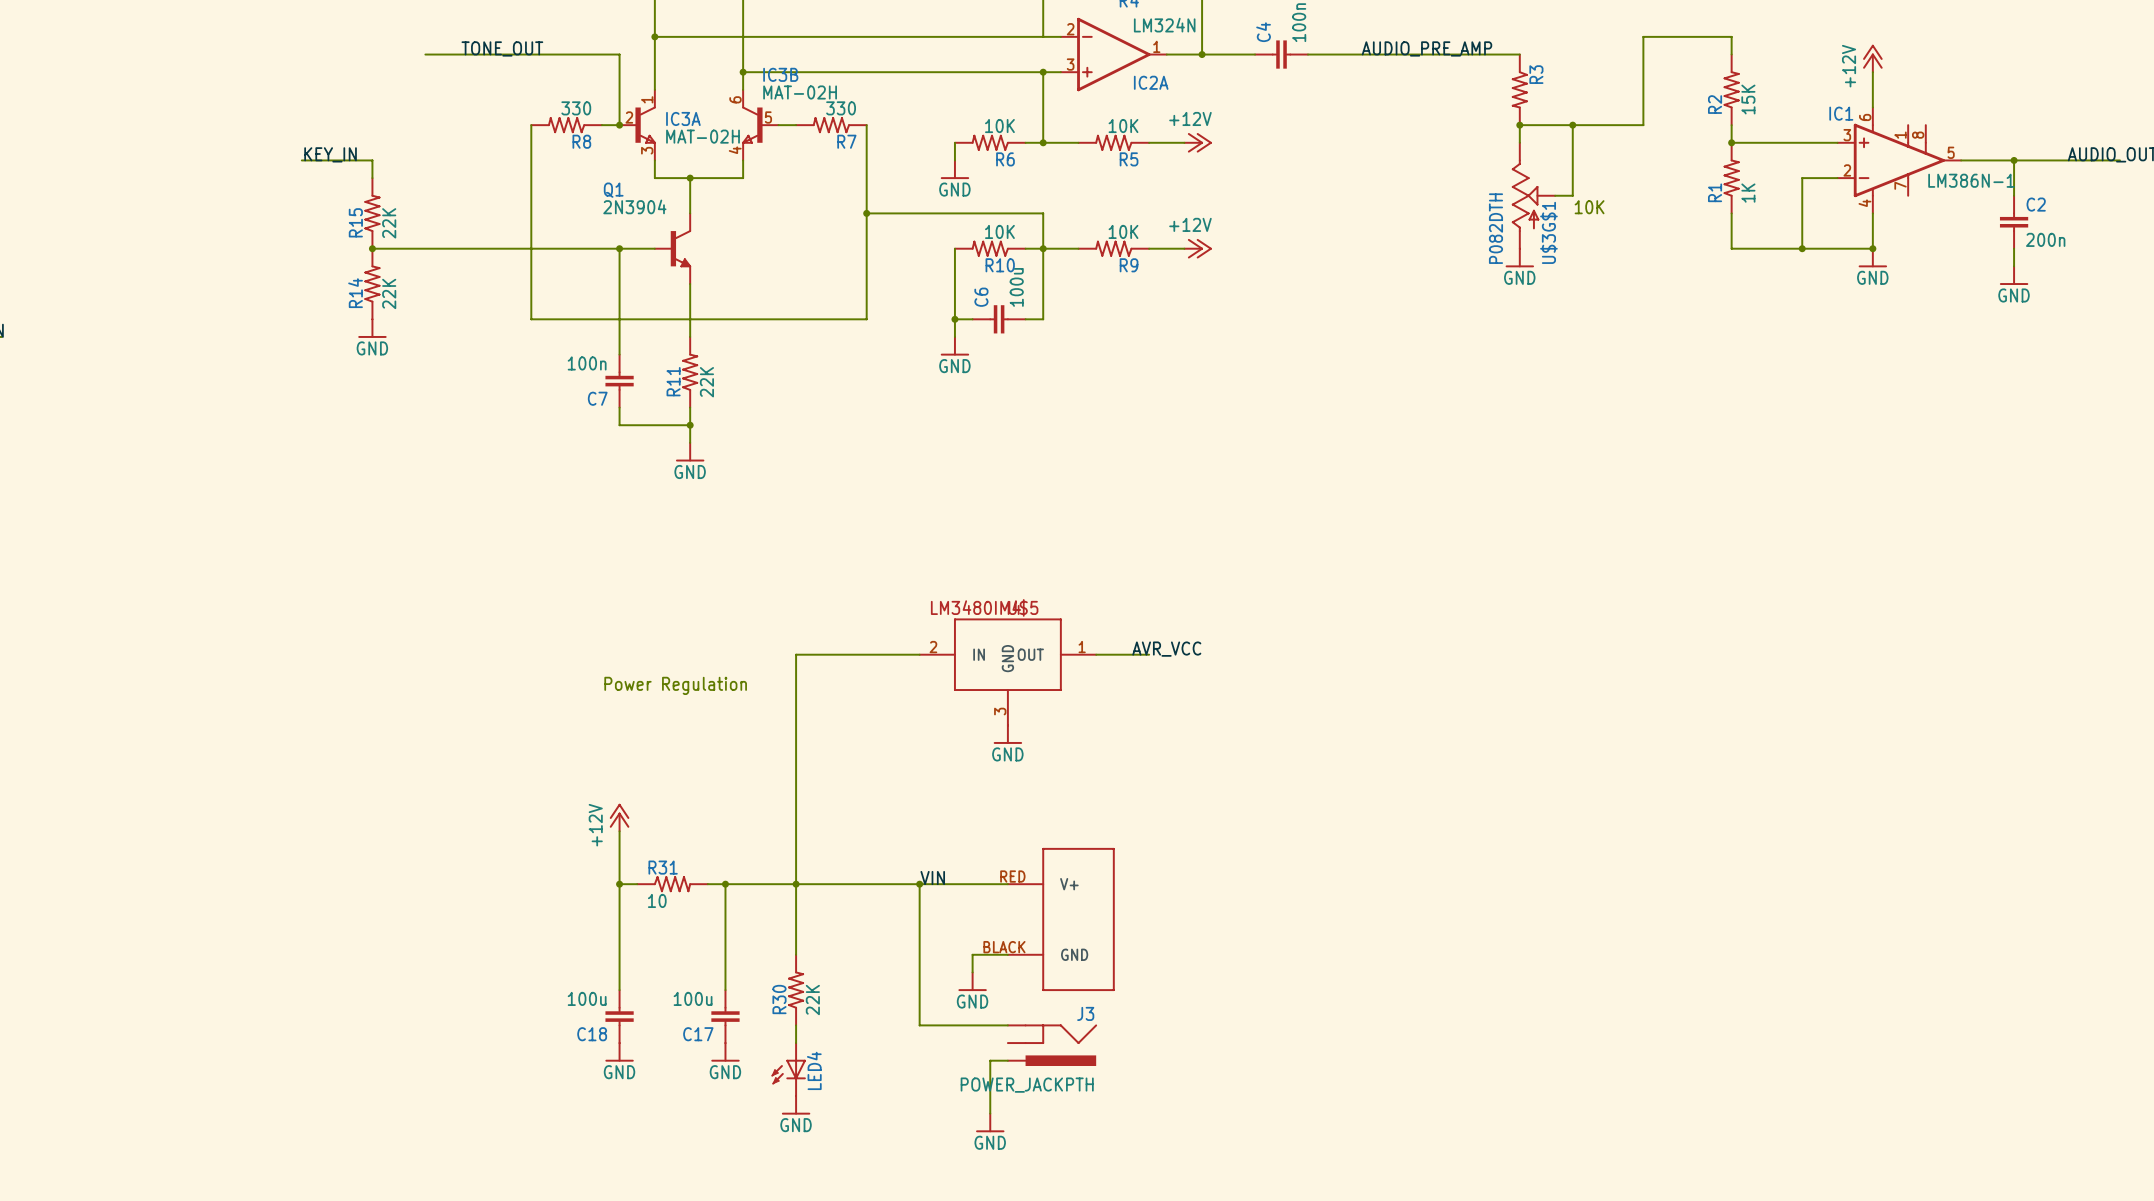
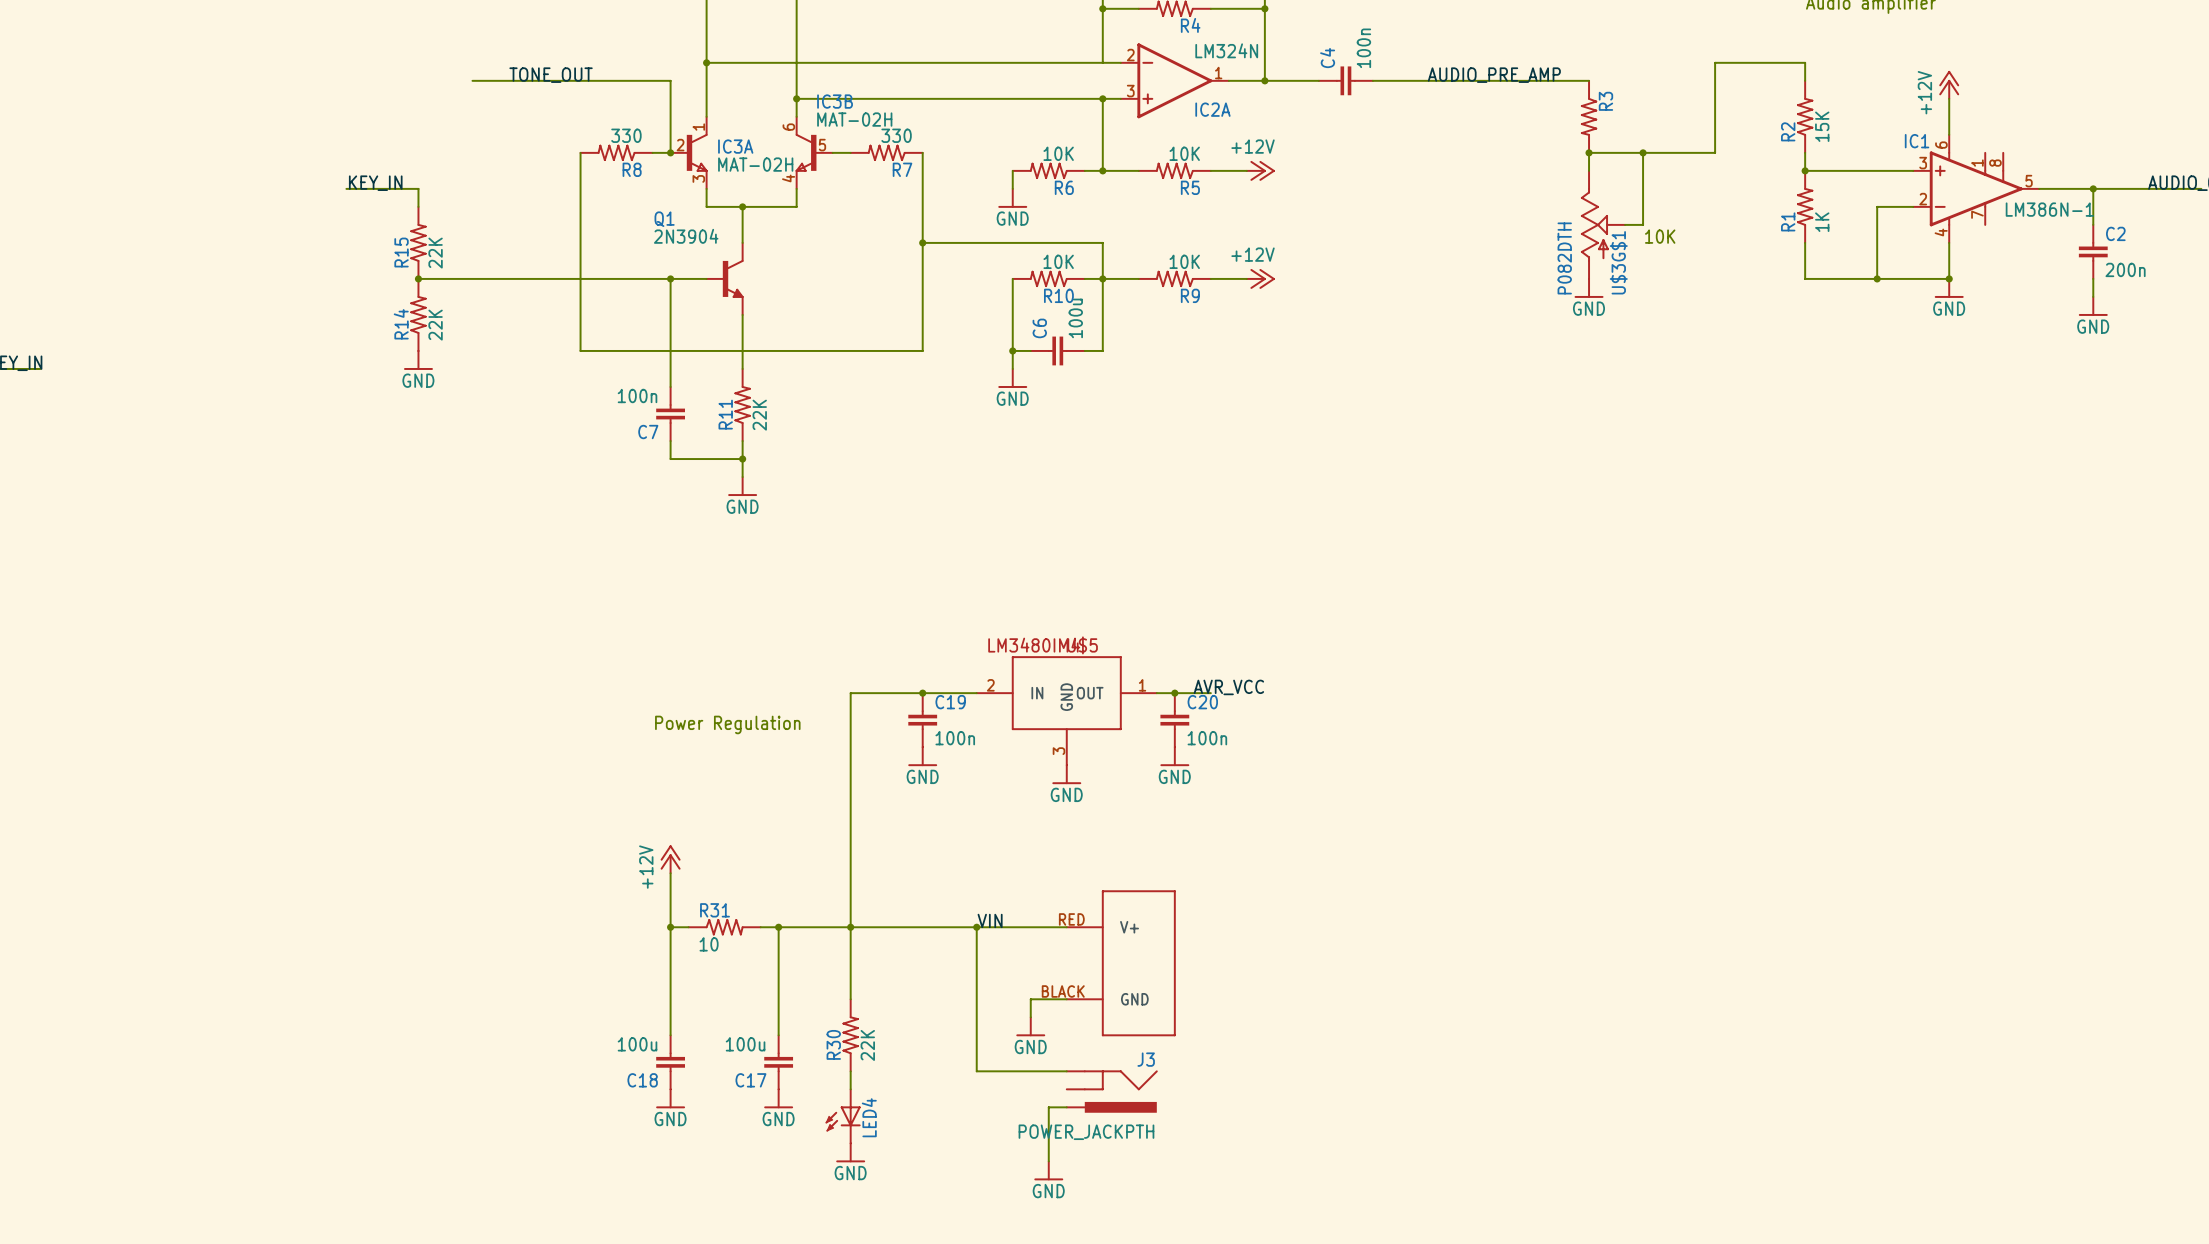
junction: none -> (922, 693)
junction: none -> (1174, 693)
C19: none -> 100n (922, 720)
C20: none -> 100n (1174, 720)
power symbol: none -> GND (922, 756)
power symbol: none -> GND (1174, 756)

